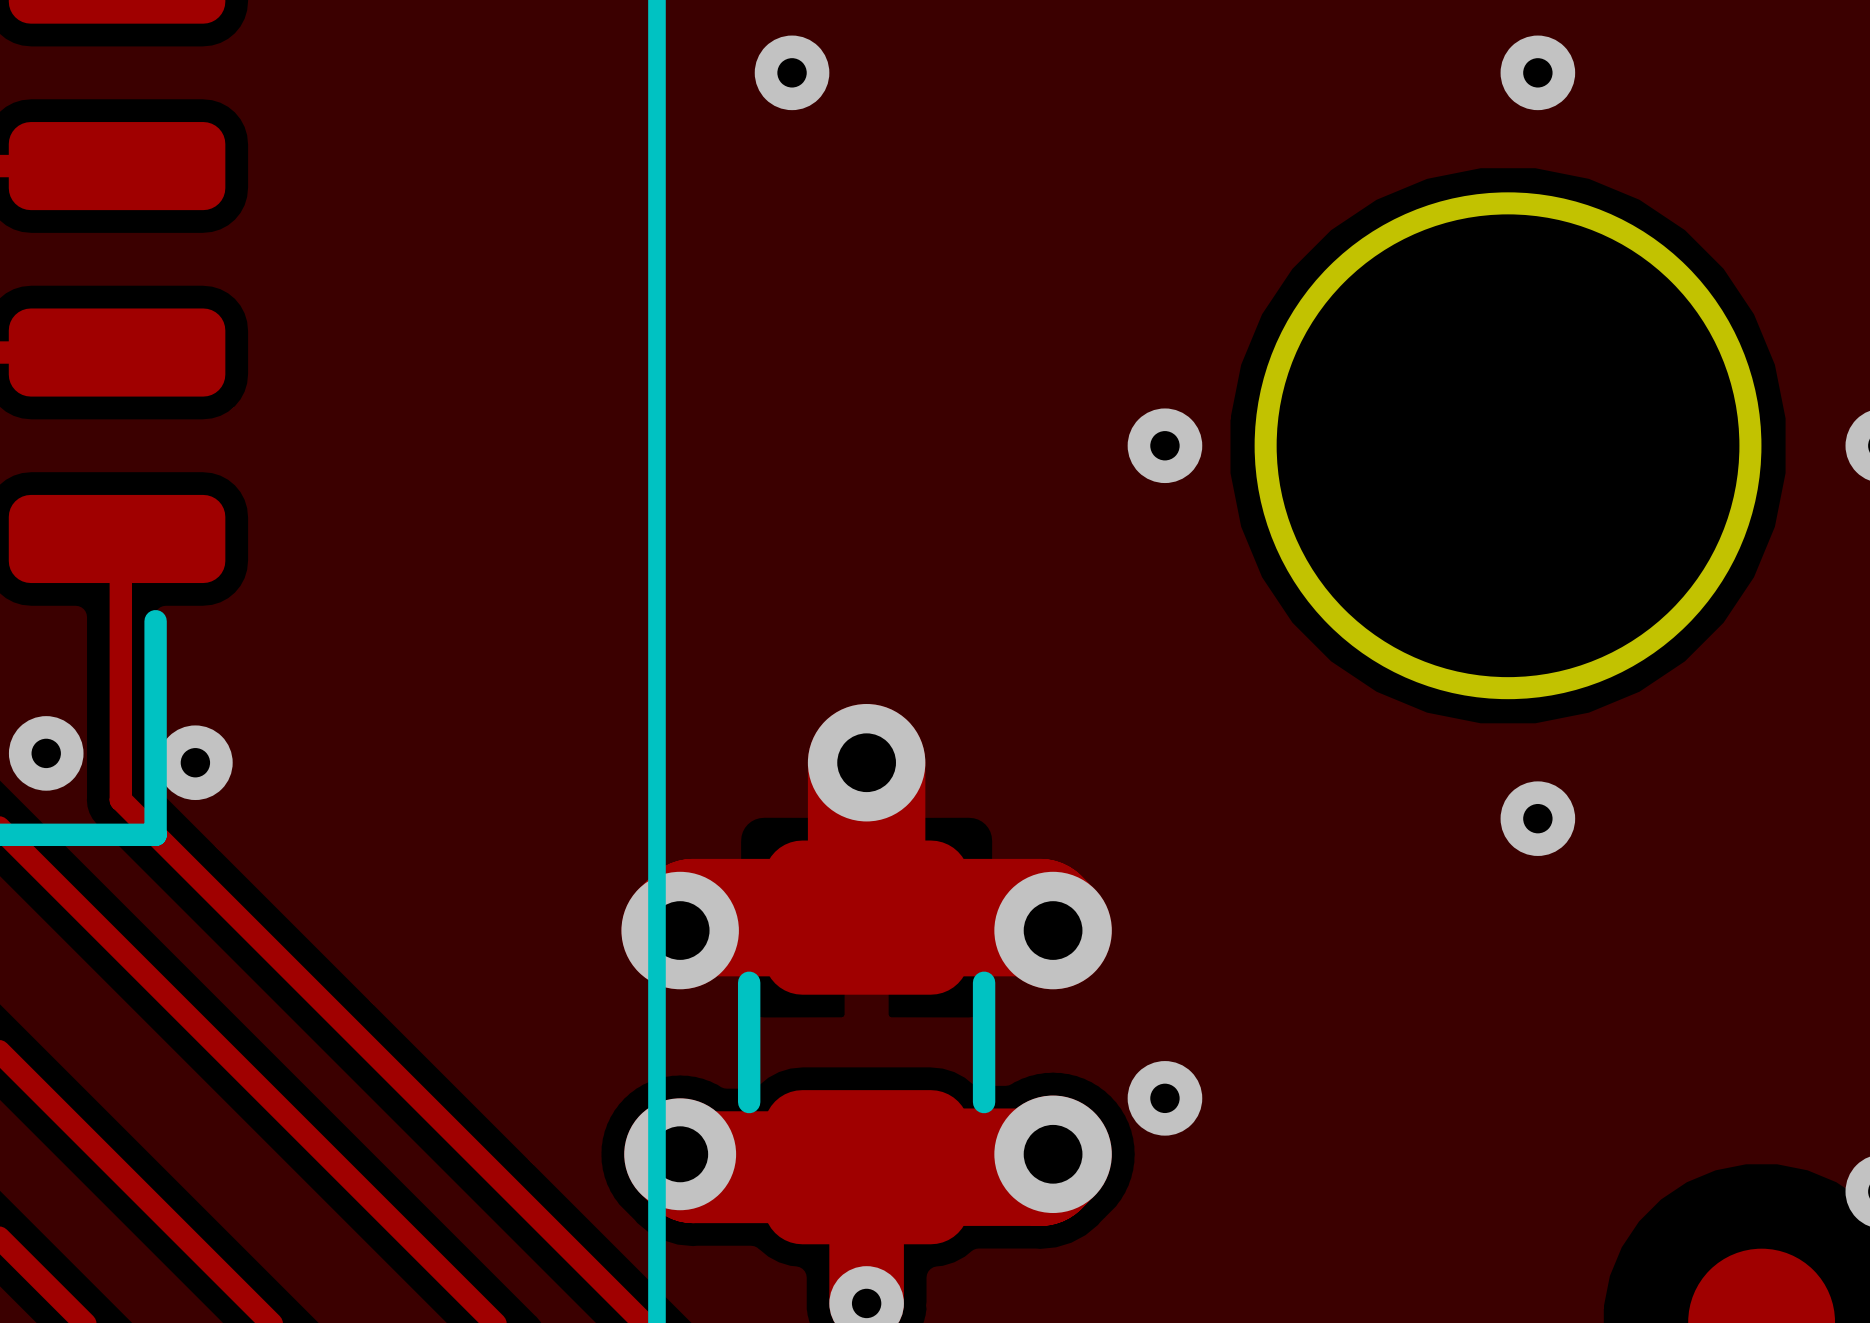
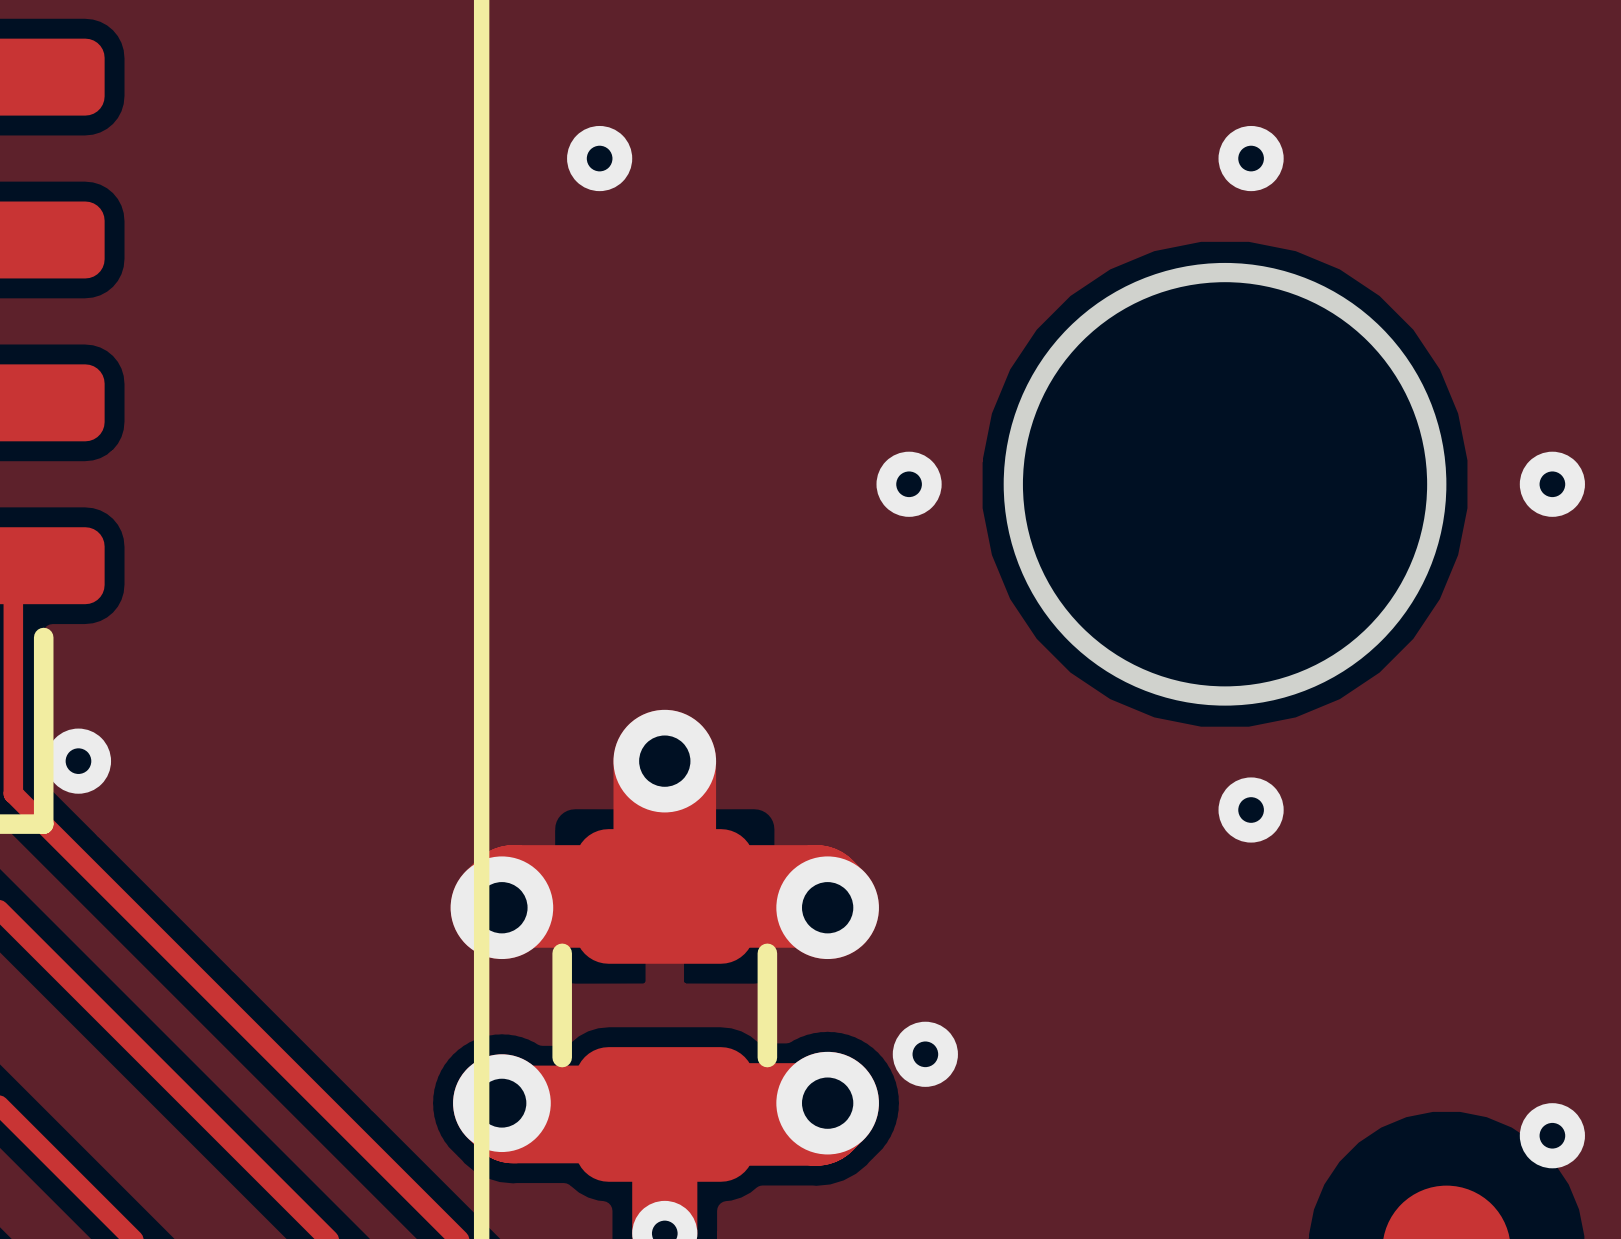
via position: (1164, 445) -> (909, 484)

